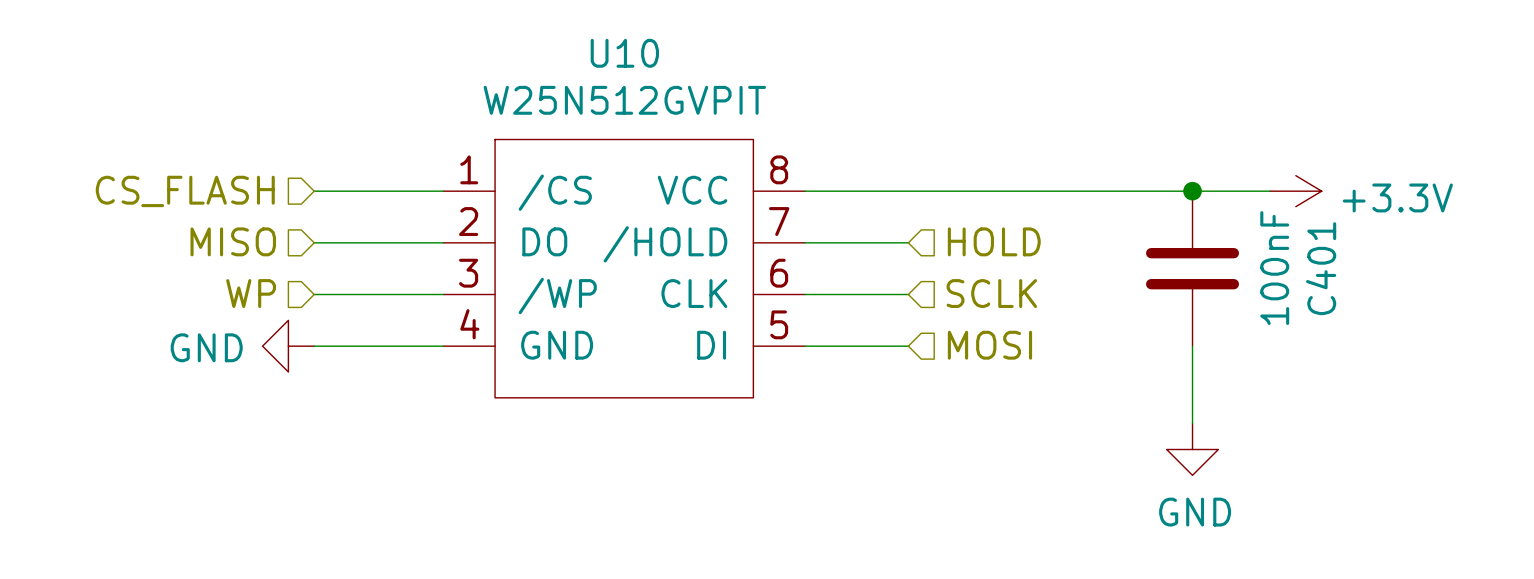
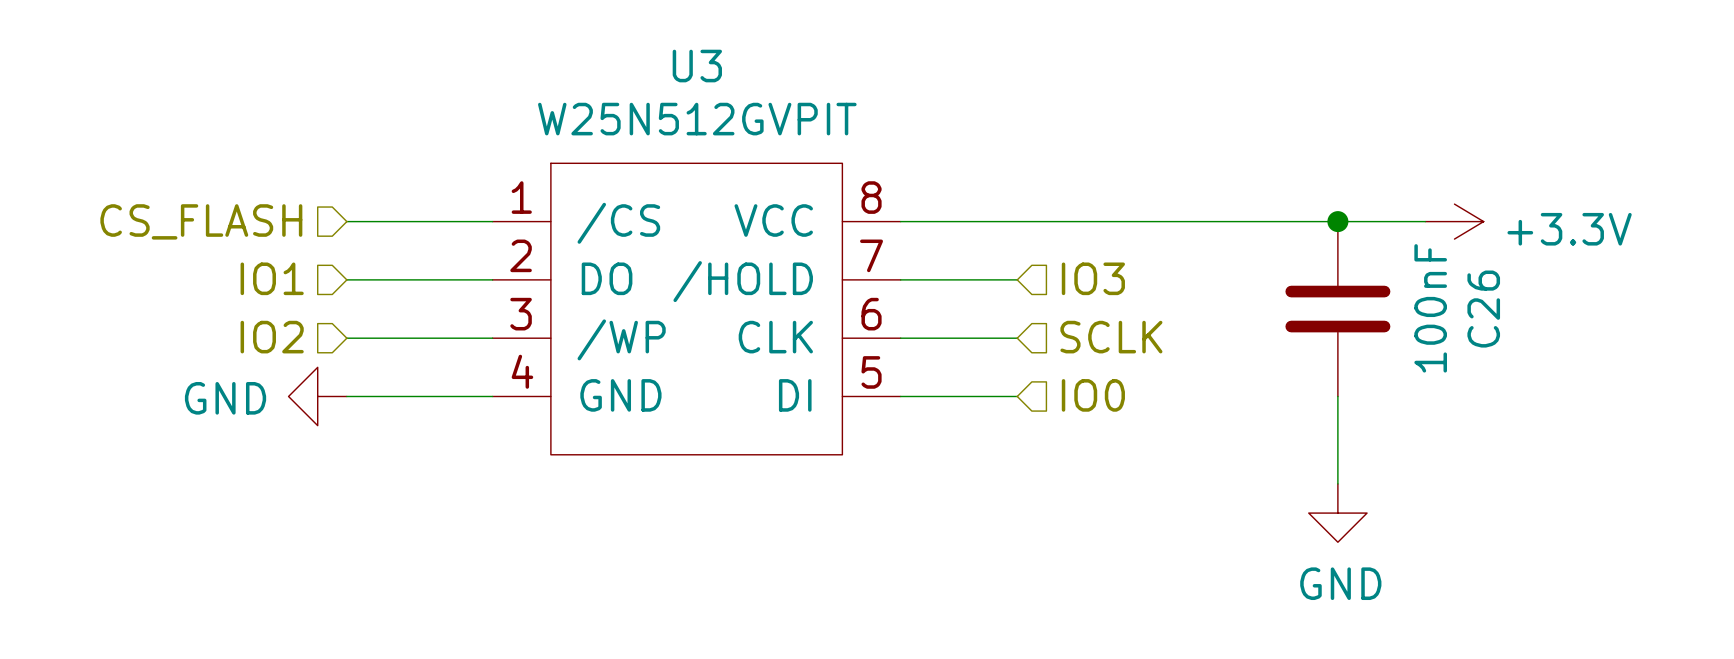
U10 name: U10 (624, 53) -> U3 (697, 66)
hierarchical label: MISO (233, 241) -> IO1 (272, 278)
hierarchical label: HOLD (994, 241) -> IO3 (1093, 278)
C401 name: C401 (1321, 268) -> C26 (1483, 309)
hierarchical label: WP (251, 293) -> IO2 (272, 337)
hierarchical label: MOSI (989, 345) -> IO0 (1093, 395)

